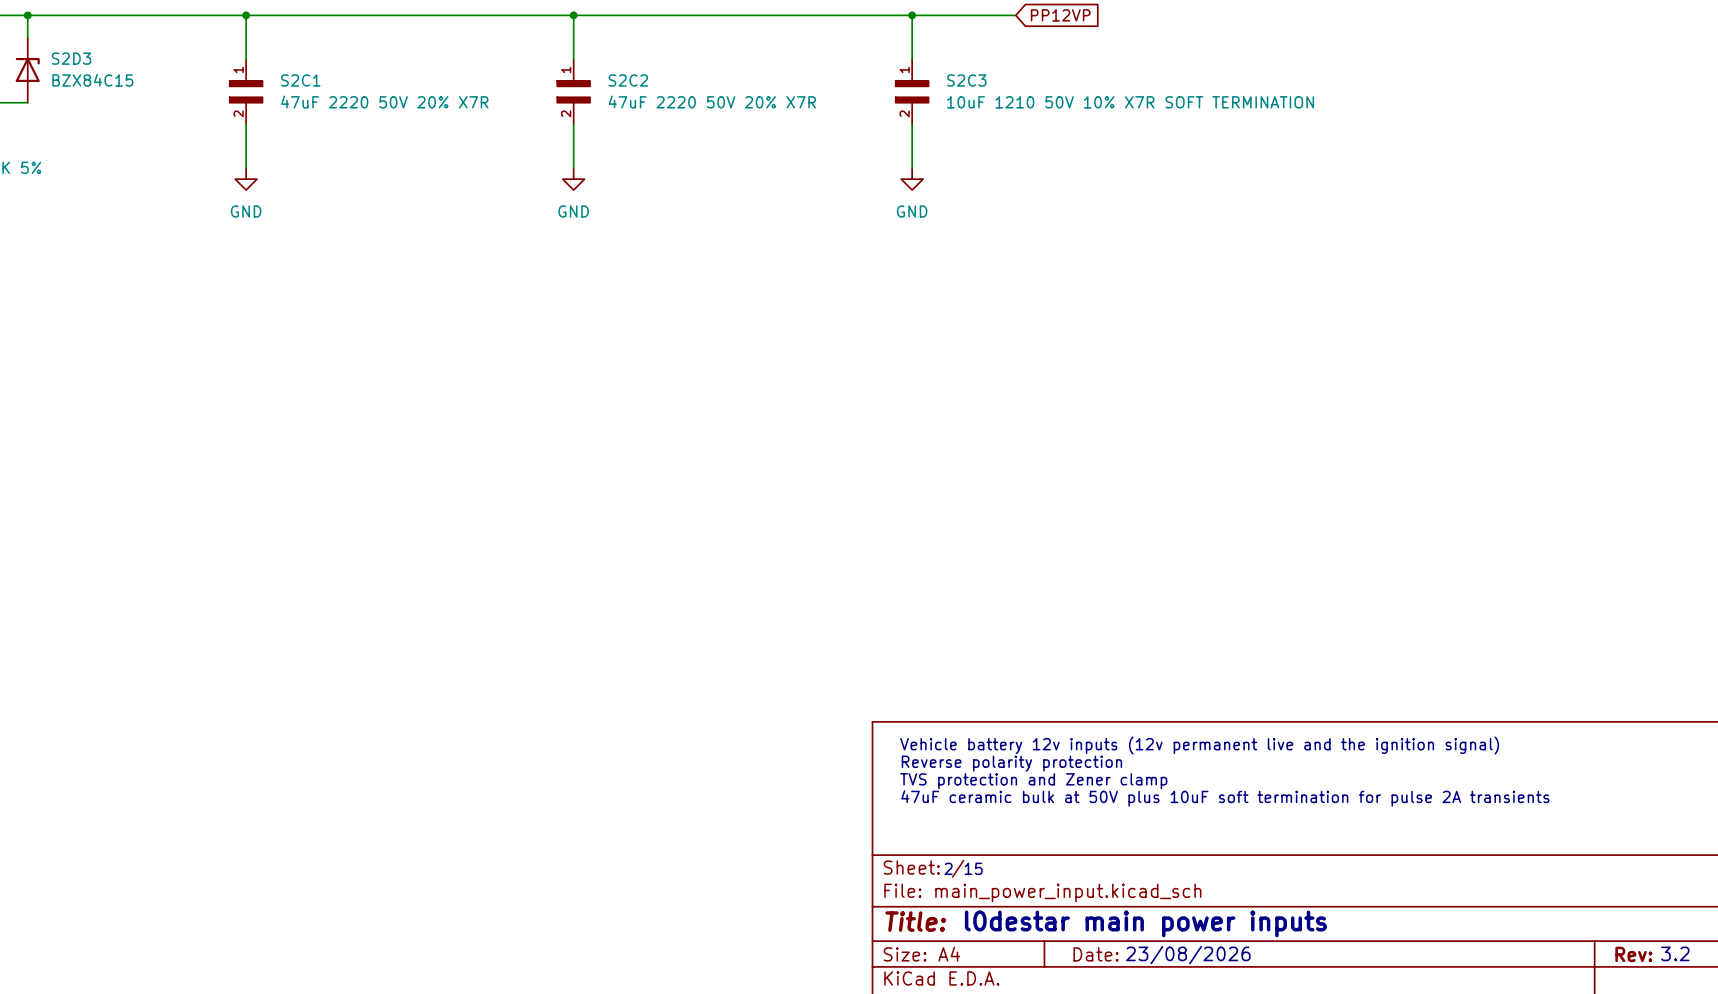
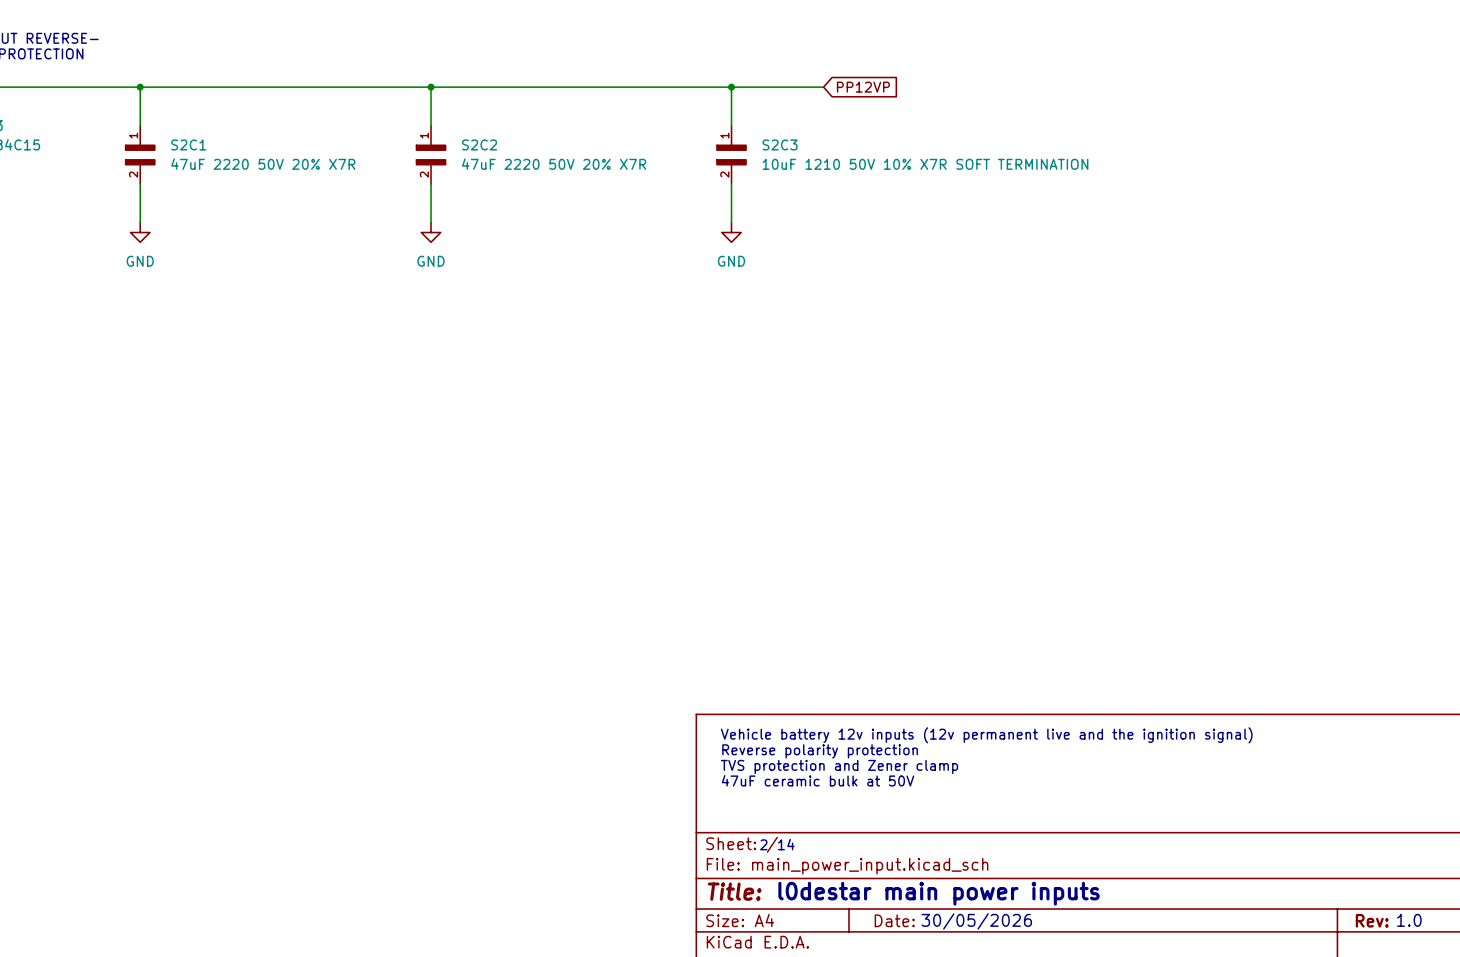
text: 47uF ceramic bulk at 50V plus 10uF soft termination for pulse 2A transients (1225, 798) -> 47uF ceramic bulk at 50V (818, 780)
text: 15 (973, 868) -> 14 (786, 844)
text: 3.2 (1675, 953) -> 1.0 (1409, 920)
text: 23/08/2026 (1188, 955) -> 30/05/2026 (976, 921)

